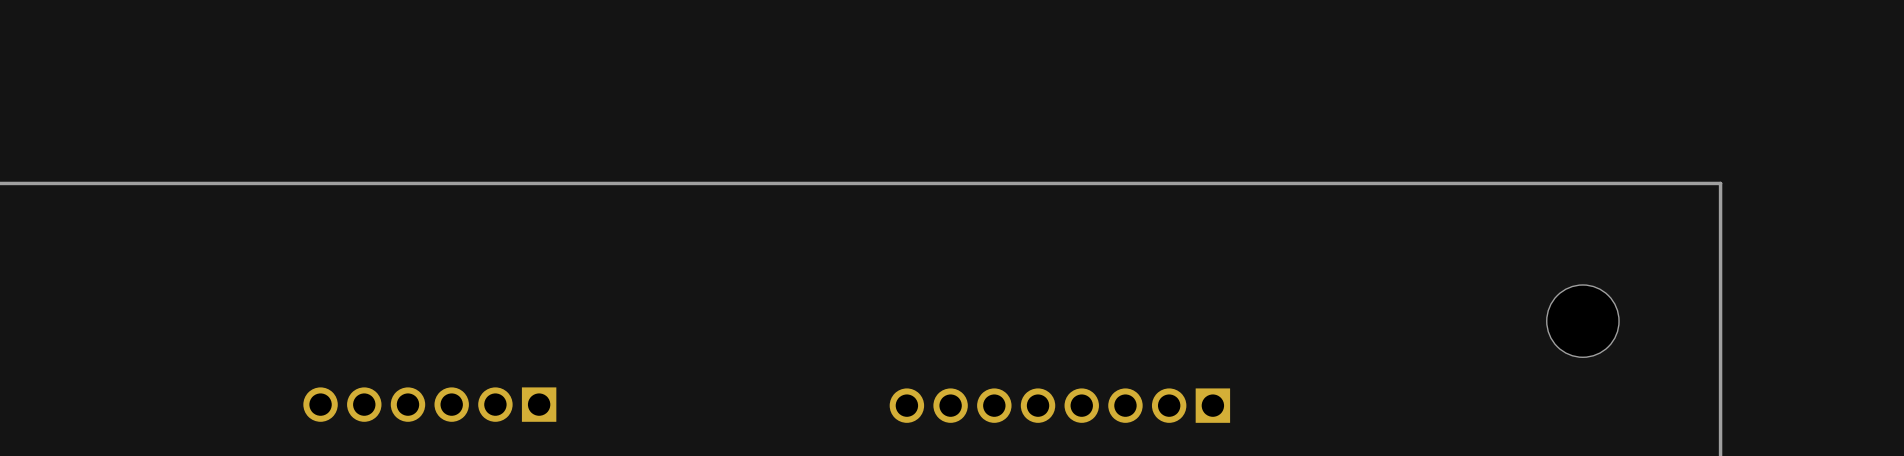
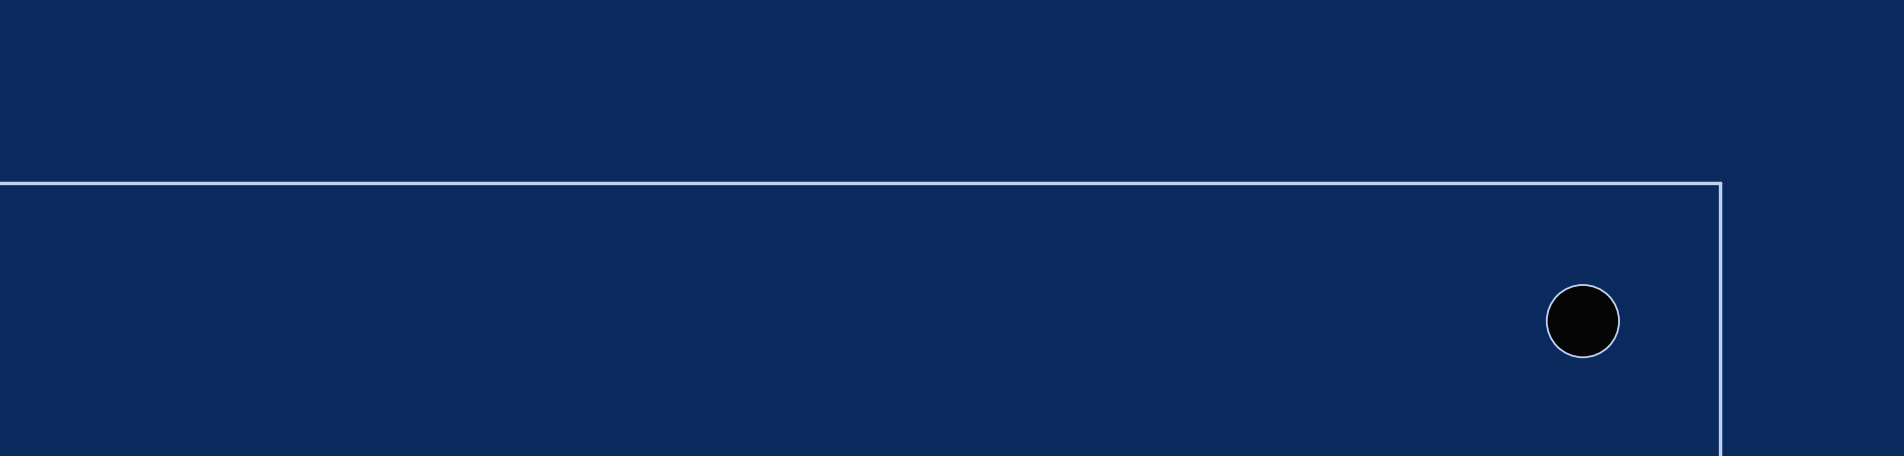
part: (429, 404) -> none
part: (1059, 405) -> none

